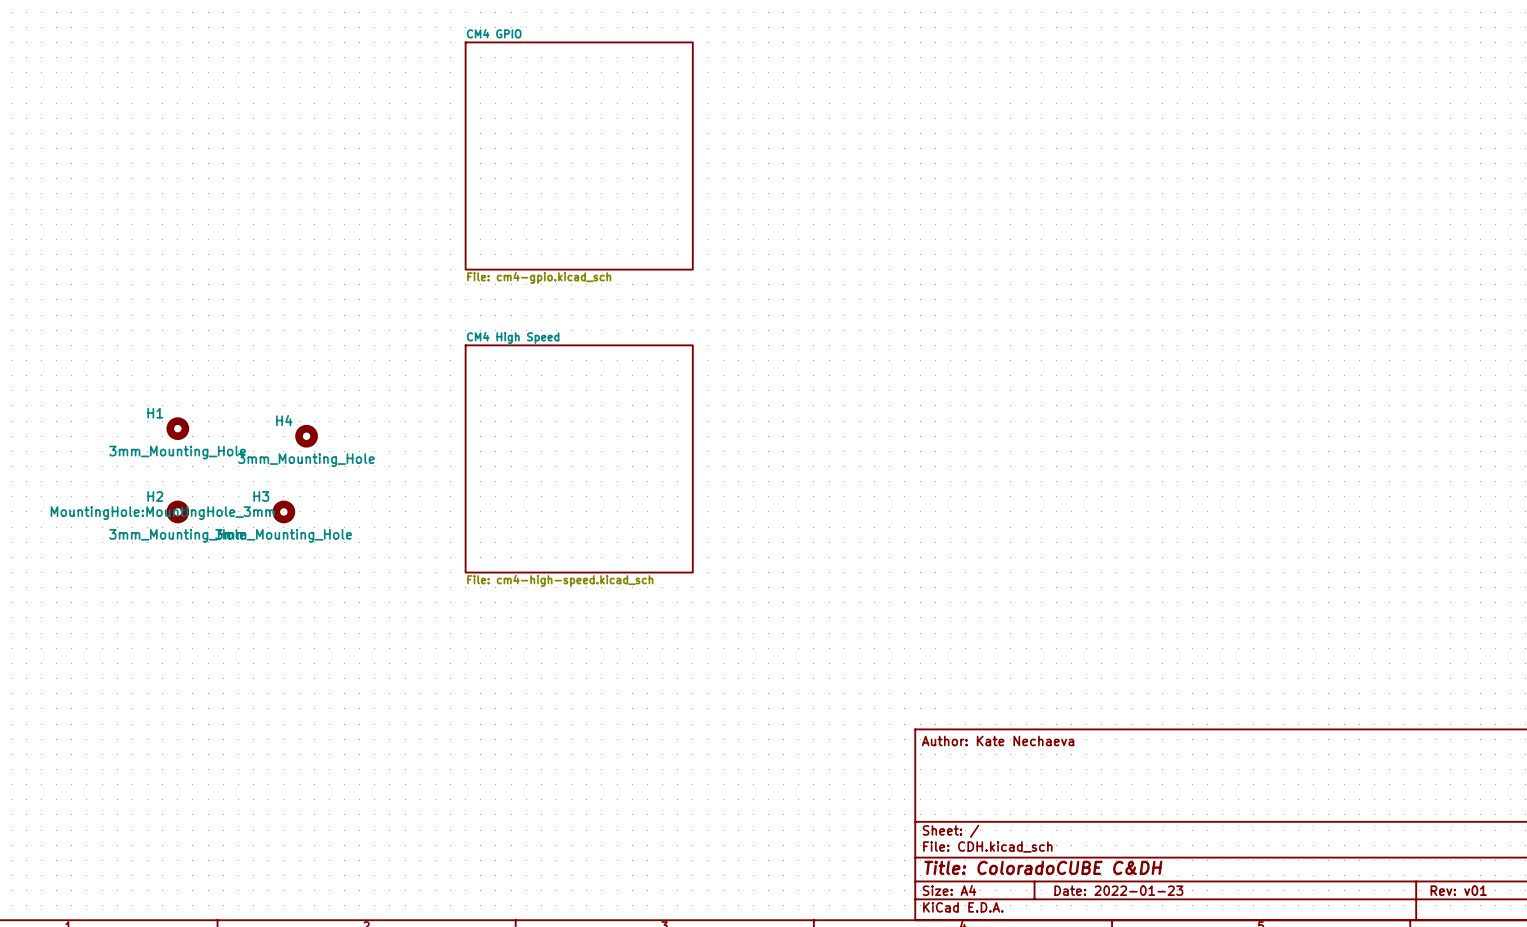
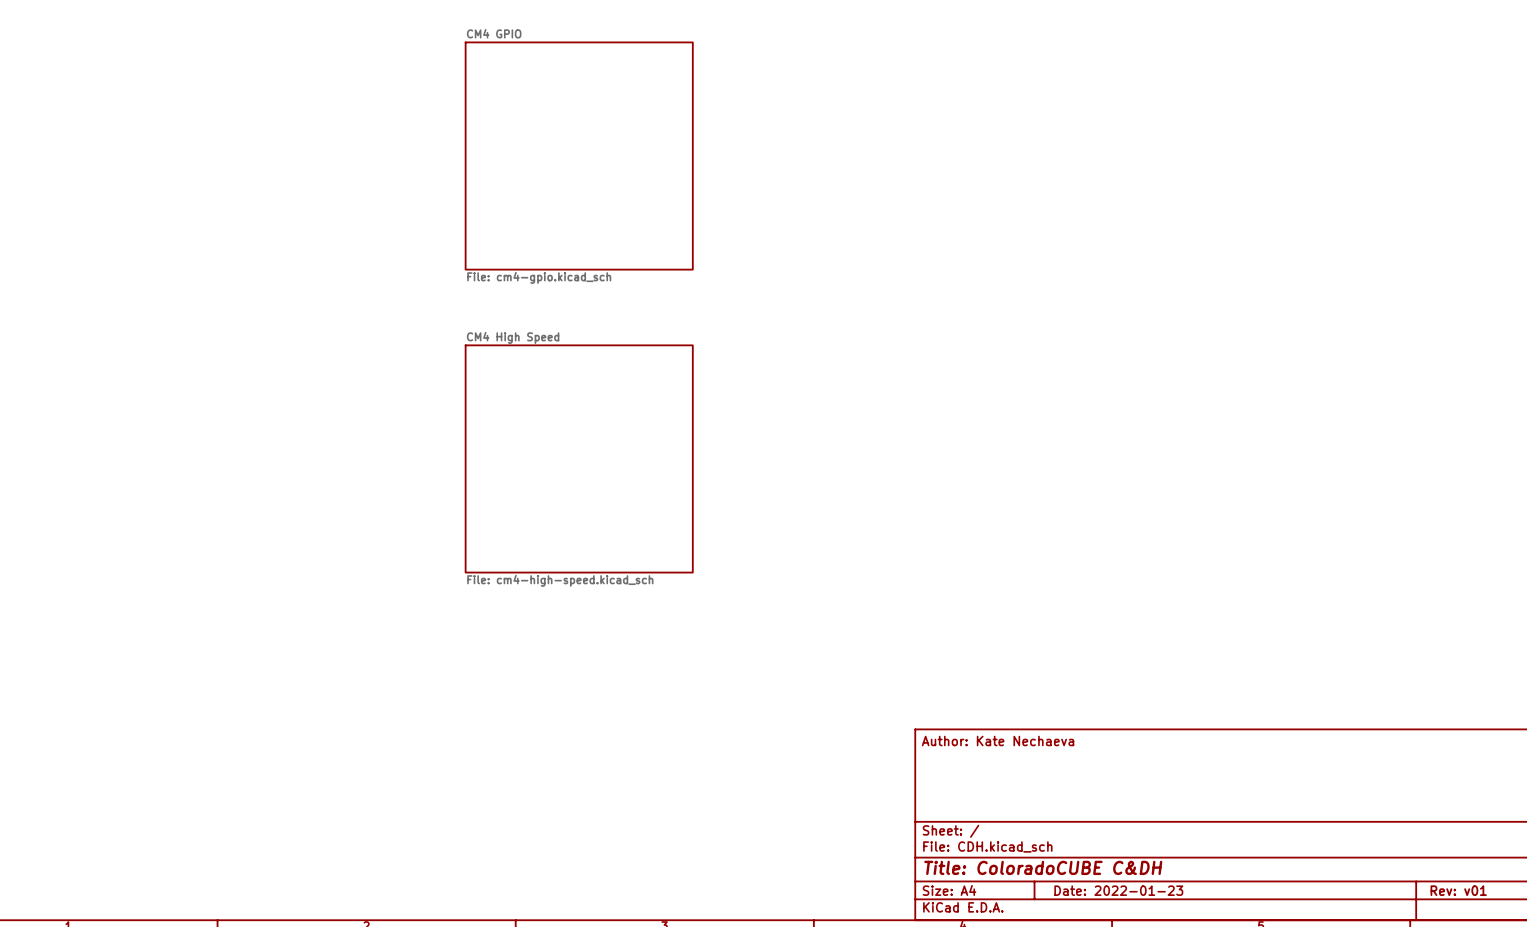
H1: 3mm_Mounting_Hole (177, 428) -> none
H4: 3mm_Mounting_Hole (306, 436) -> none
H2: 3mm_Mounting_Hole (177, 511) -> none
H3: 3mm_Mounting_Hole (283, 511) -> none

